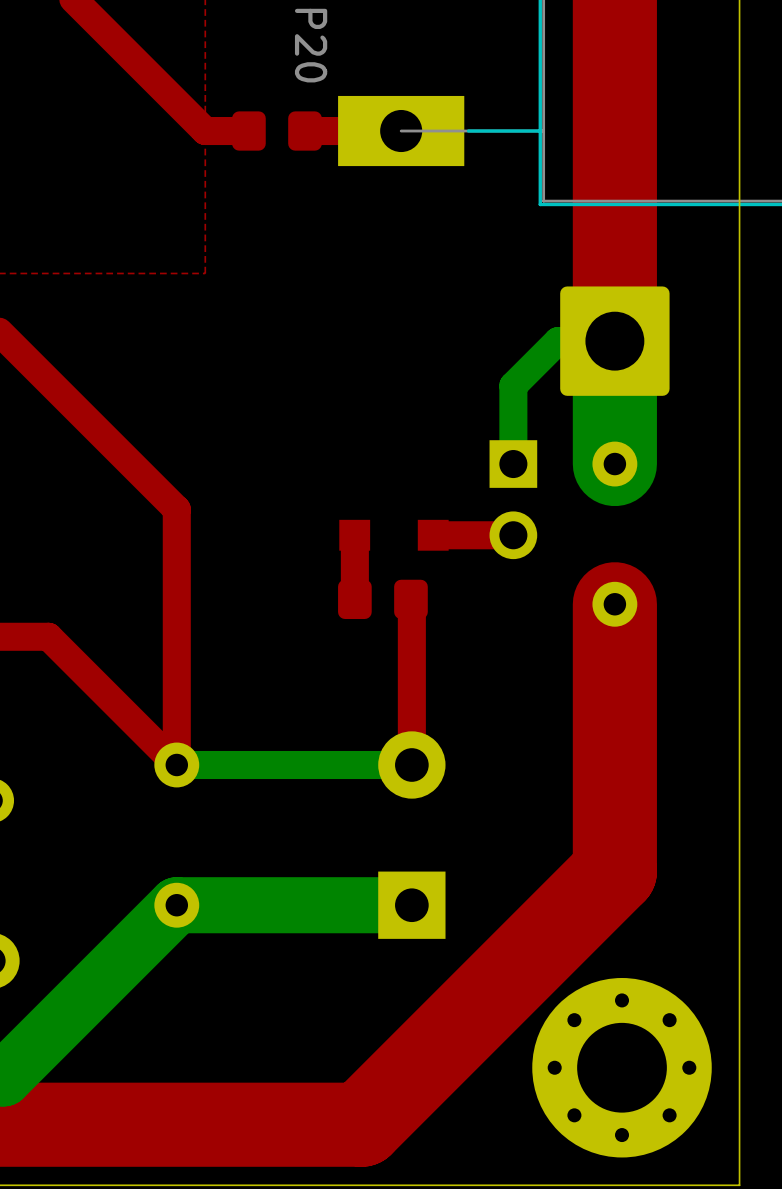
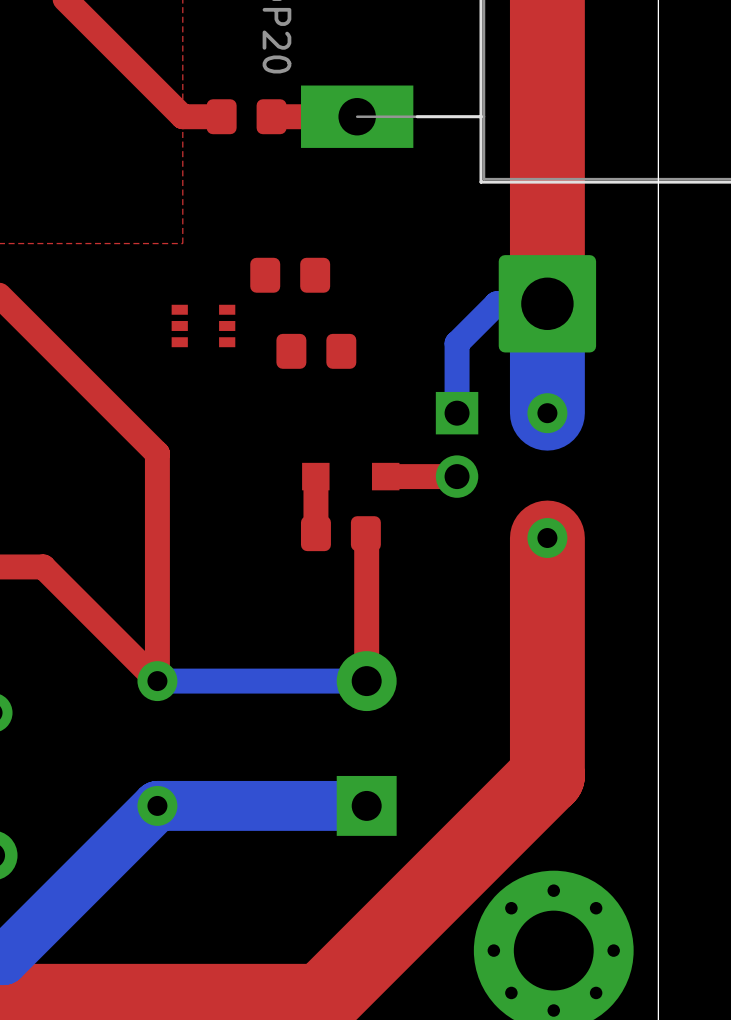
part: none -> (290, 275)
part: none -> (203, 325)
part: none -> (316, 351)

